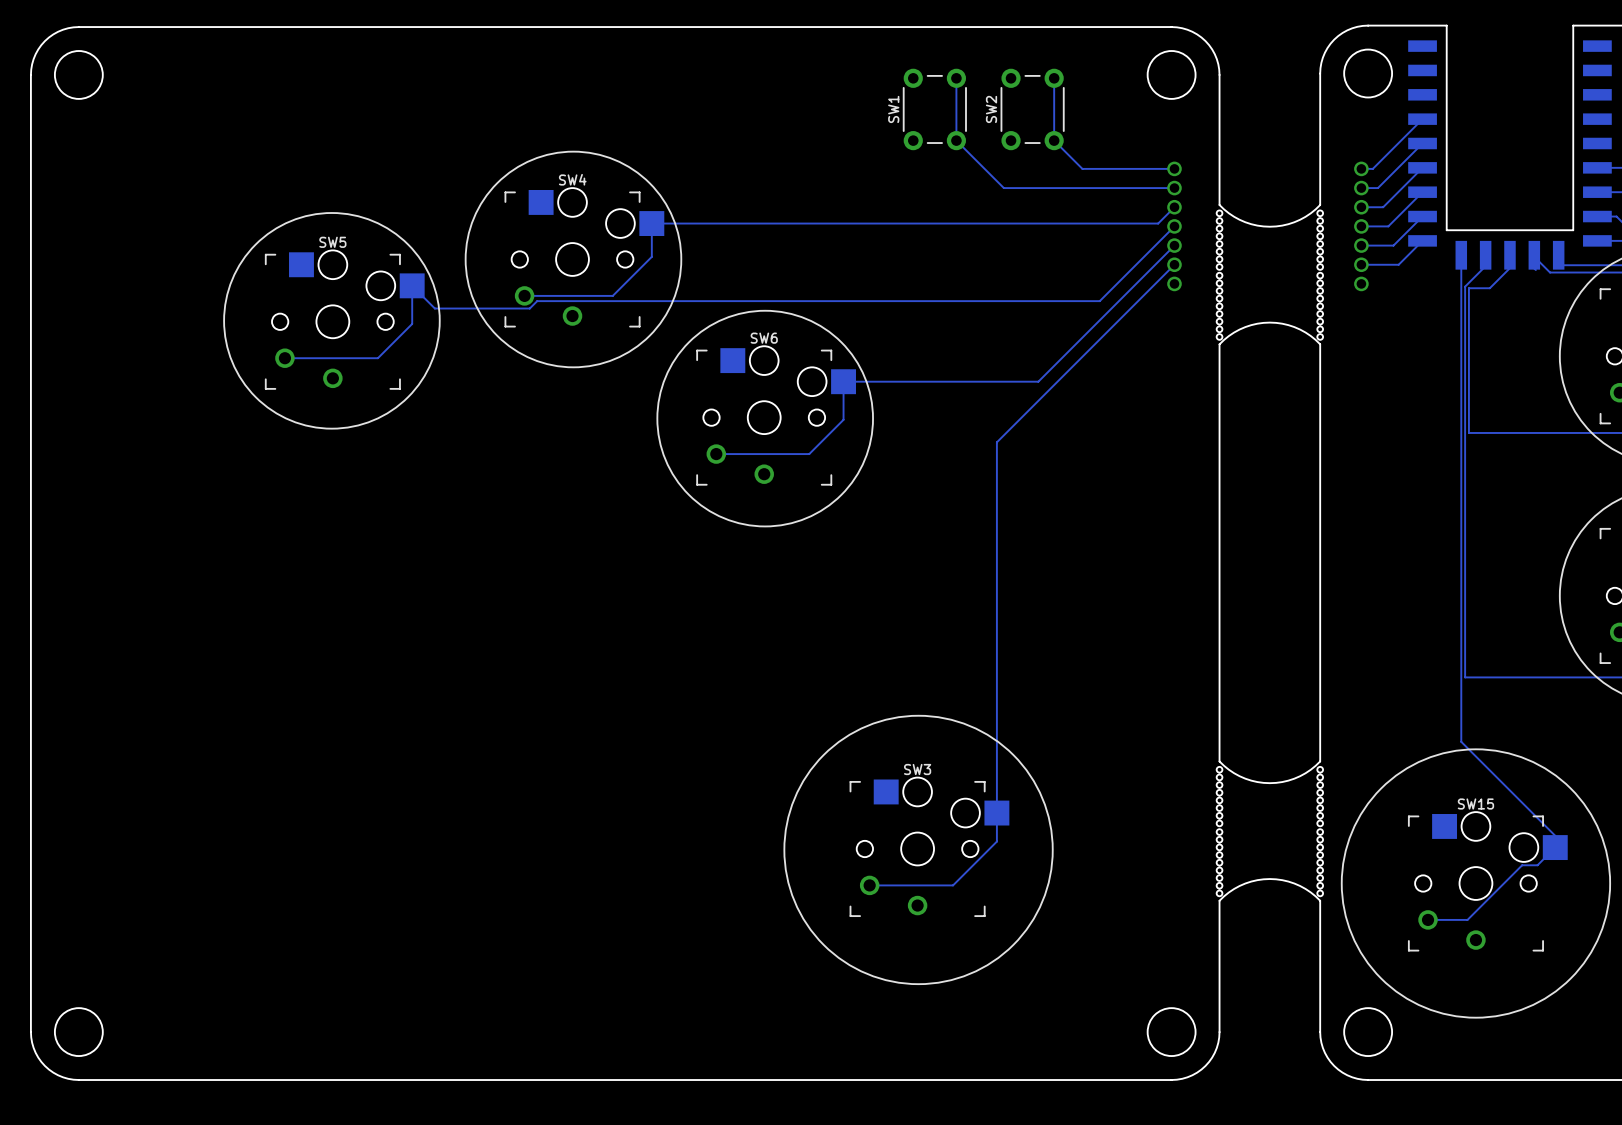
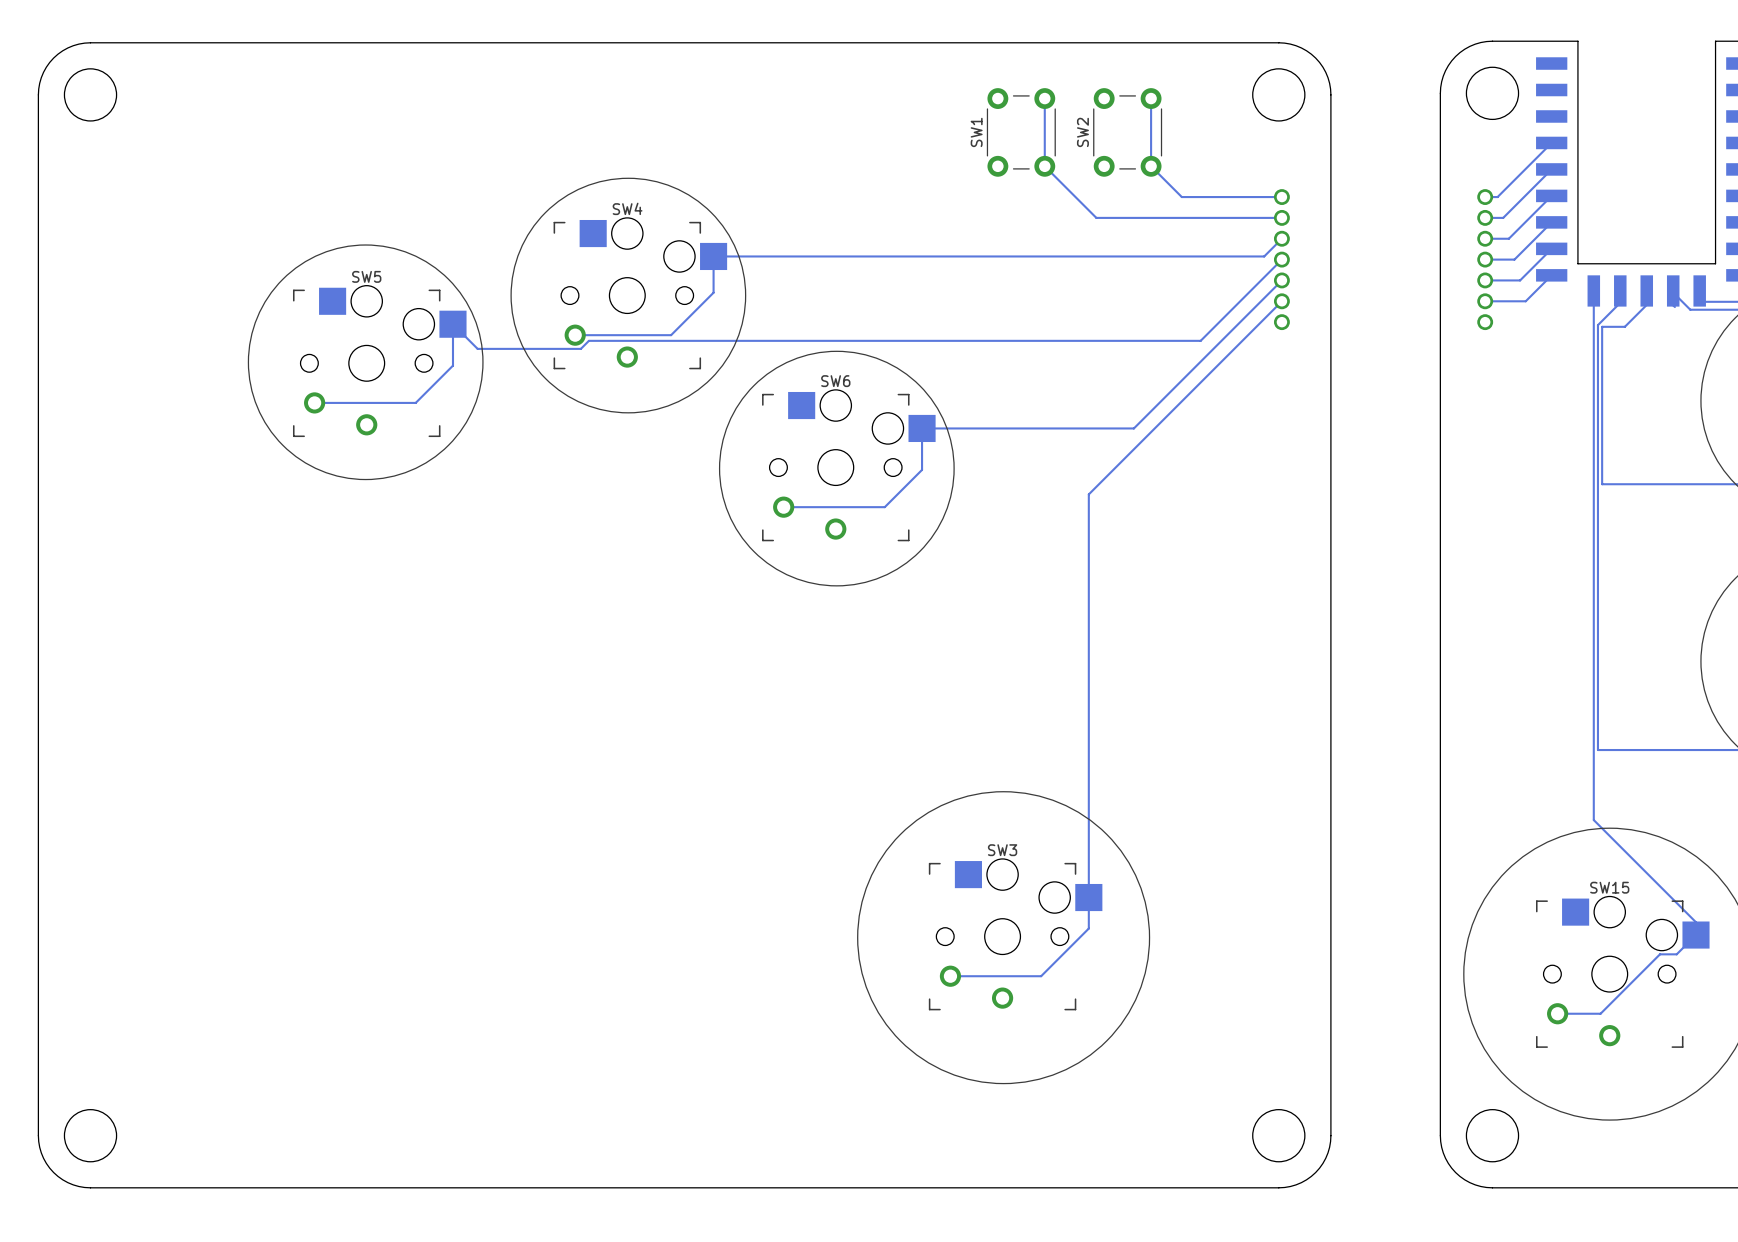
drawing: [1216, 204, 1324, 345] -> none
board edge: none -> (1330, 236) (1330, 387)
board edge: none -> (1440, 236) (1440, 387)
drawing: [1216, 760, 1324, 902] -> none
board edge: none -> (1330, 841) (1330, 992)
board edge: none -> (1440, 841) (1440, 992)

